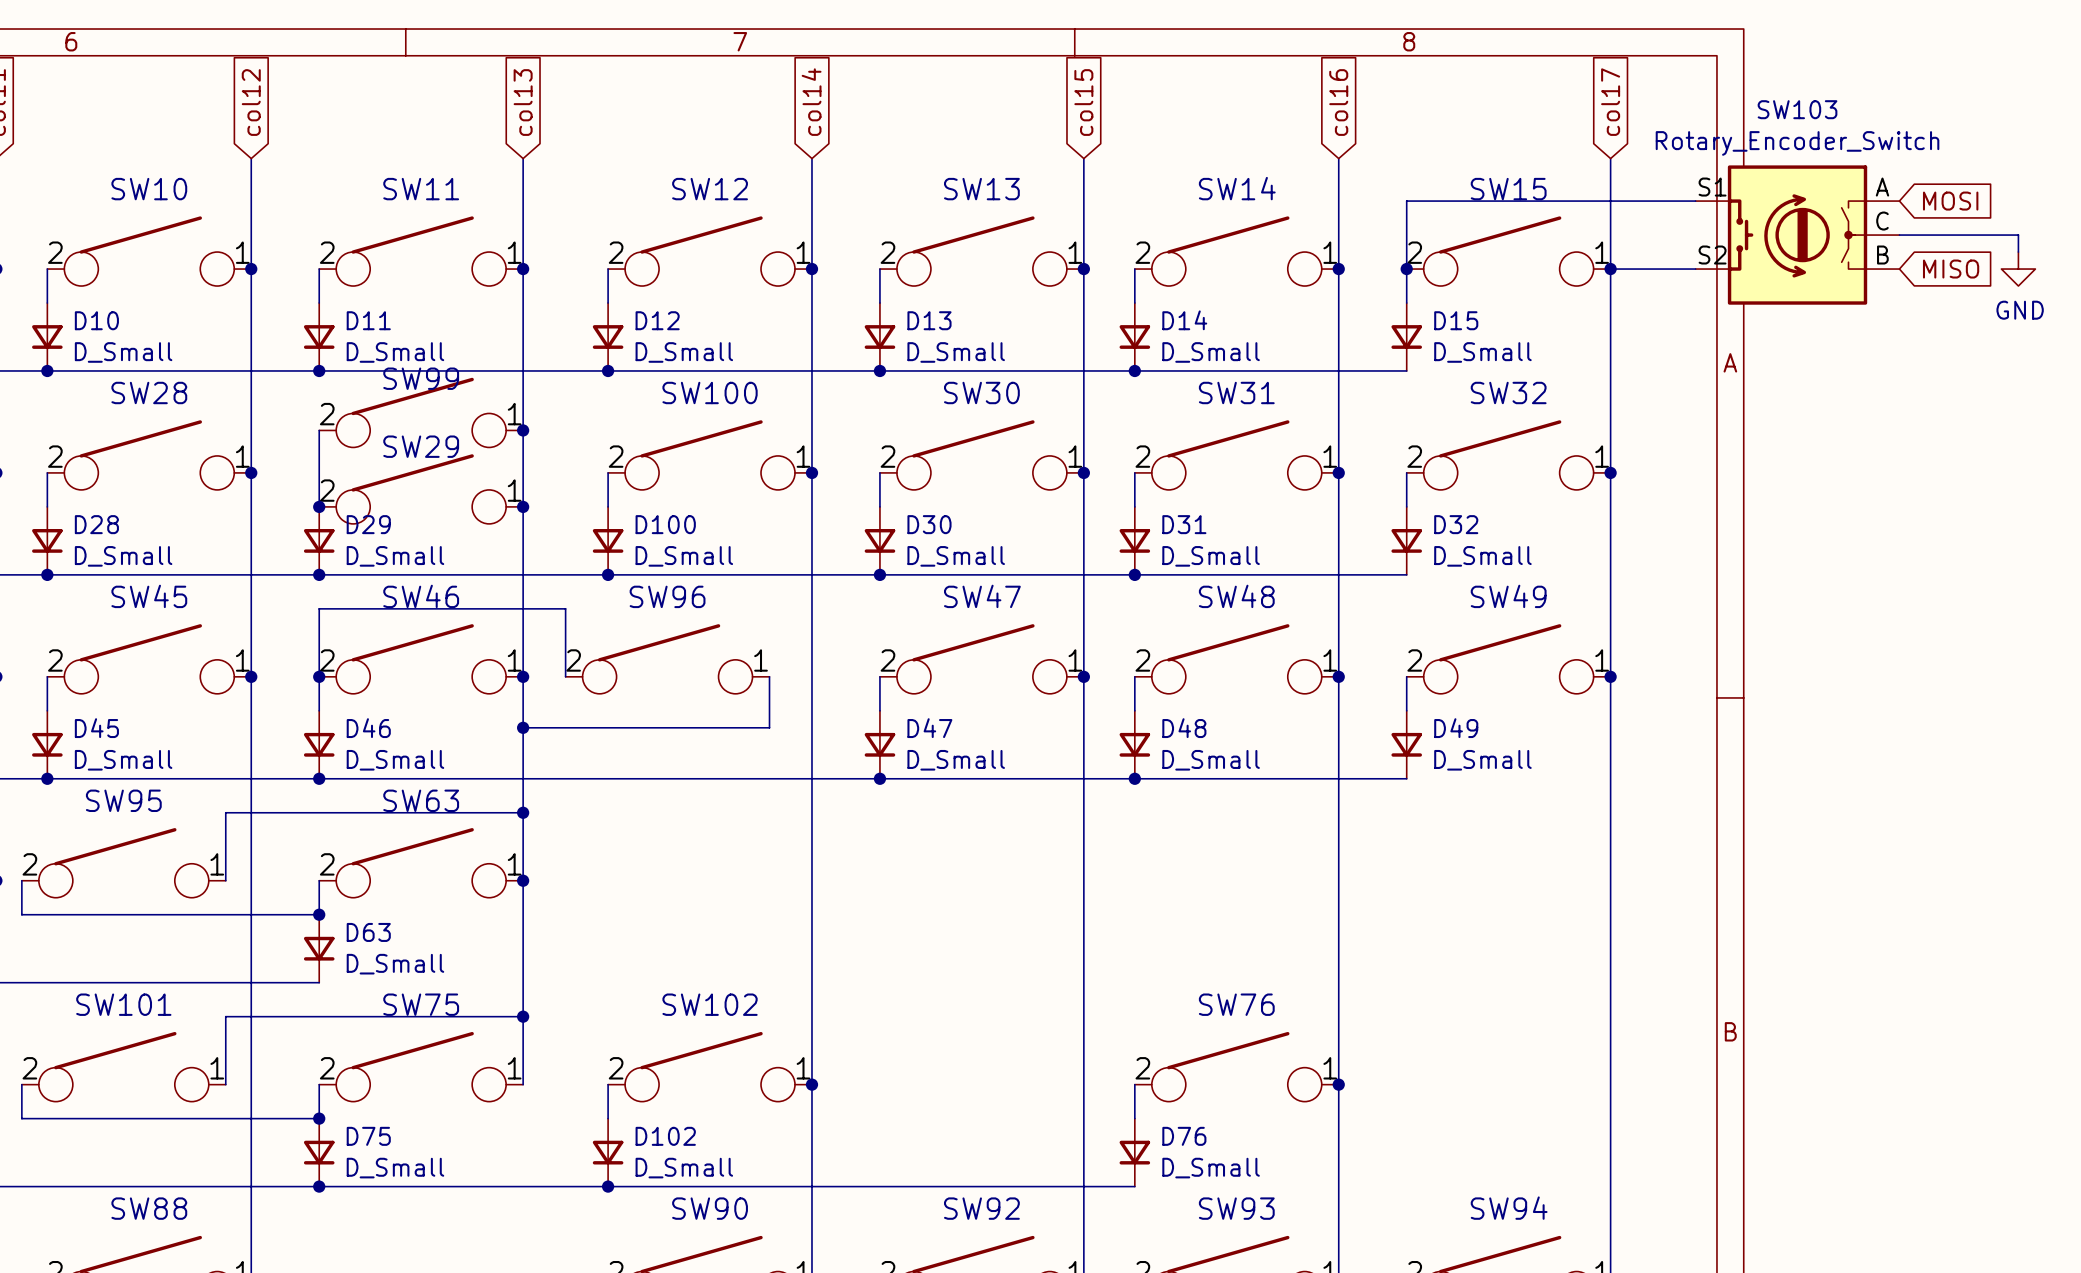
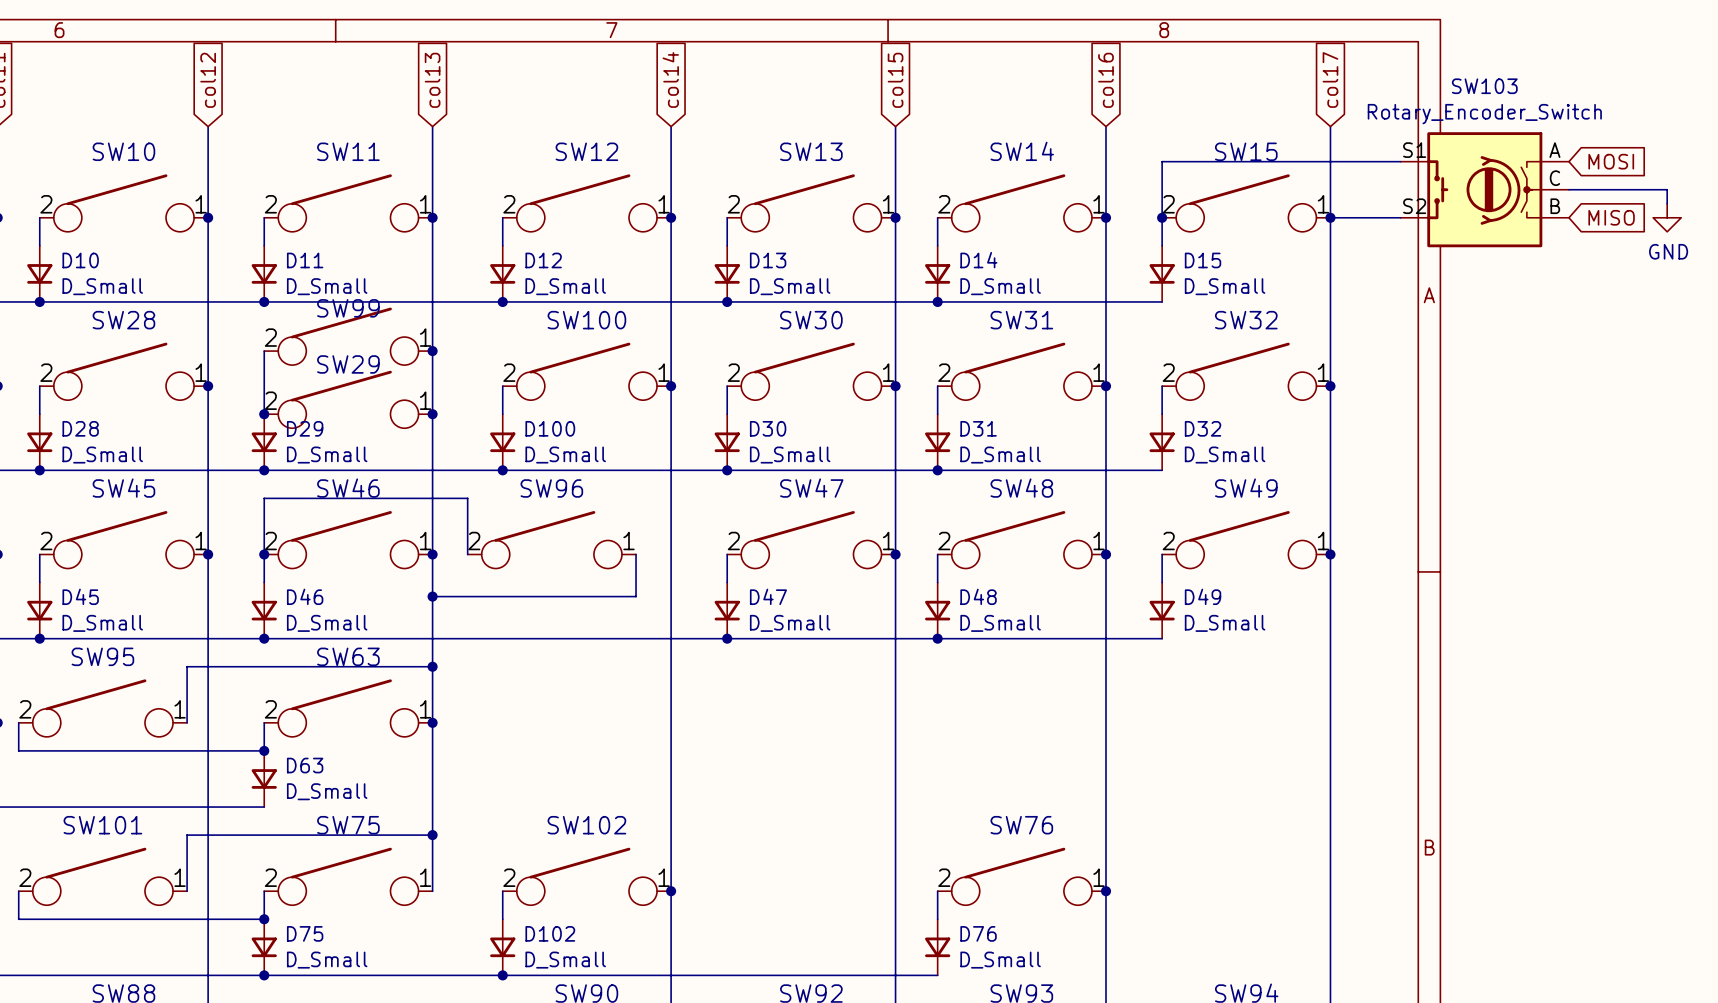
SW103 symbol: [1695, 165, 1900, 305] -> [1400, 132, 1569, 248]

